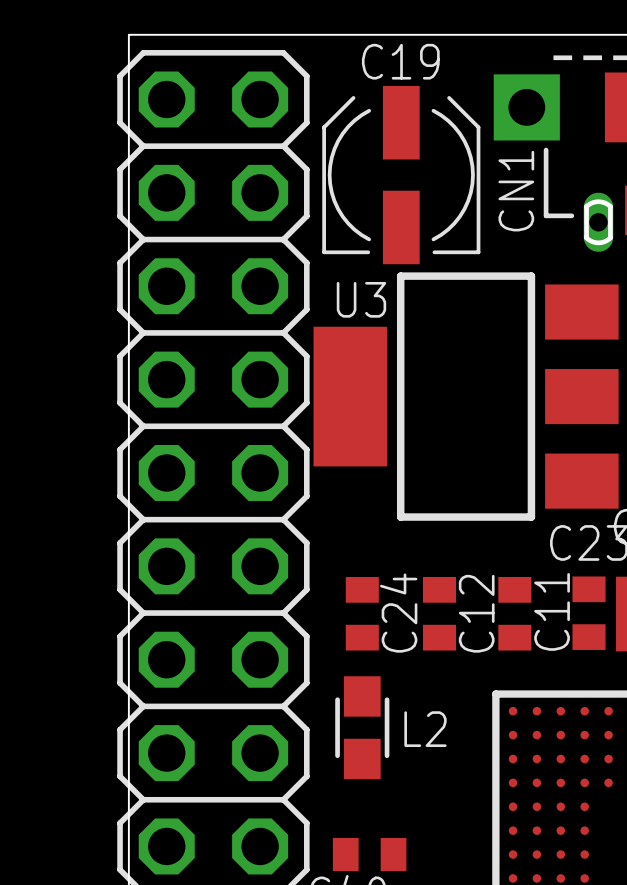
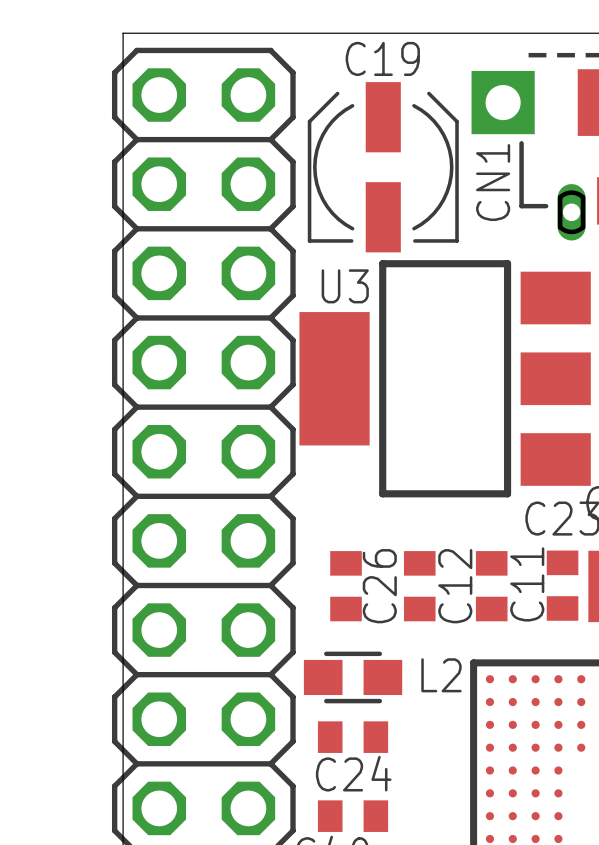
C24 name: C24 (398, 613) -> C26 (379, 586)
L2 rotation: 0° (362, 727) -> 90° clockwise (353, 677)
C24: none -> (353, 737)

